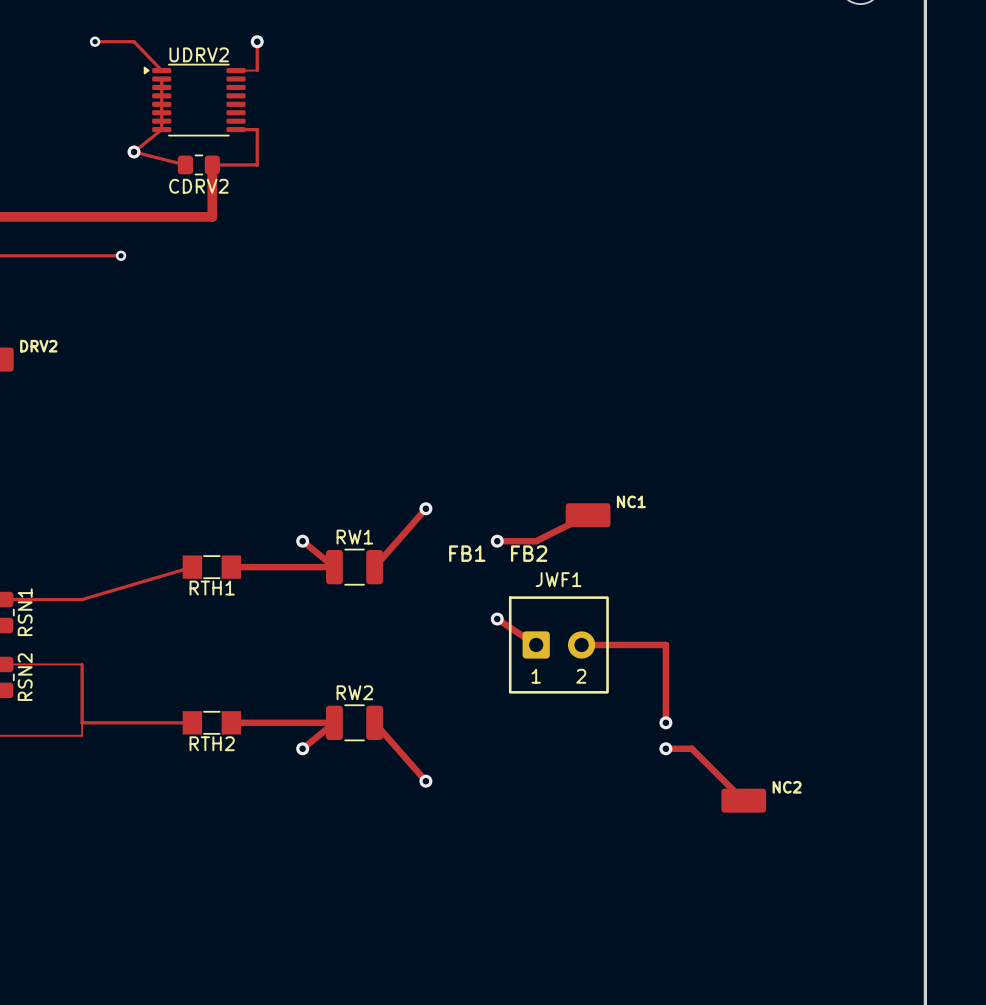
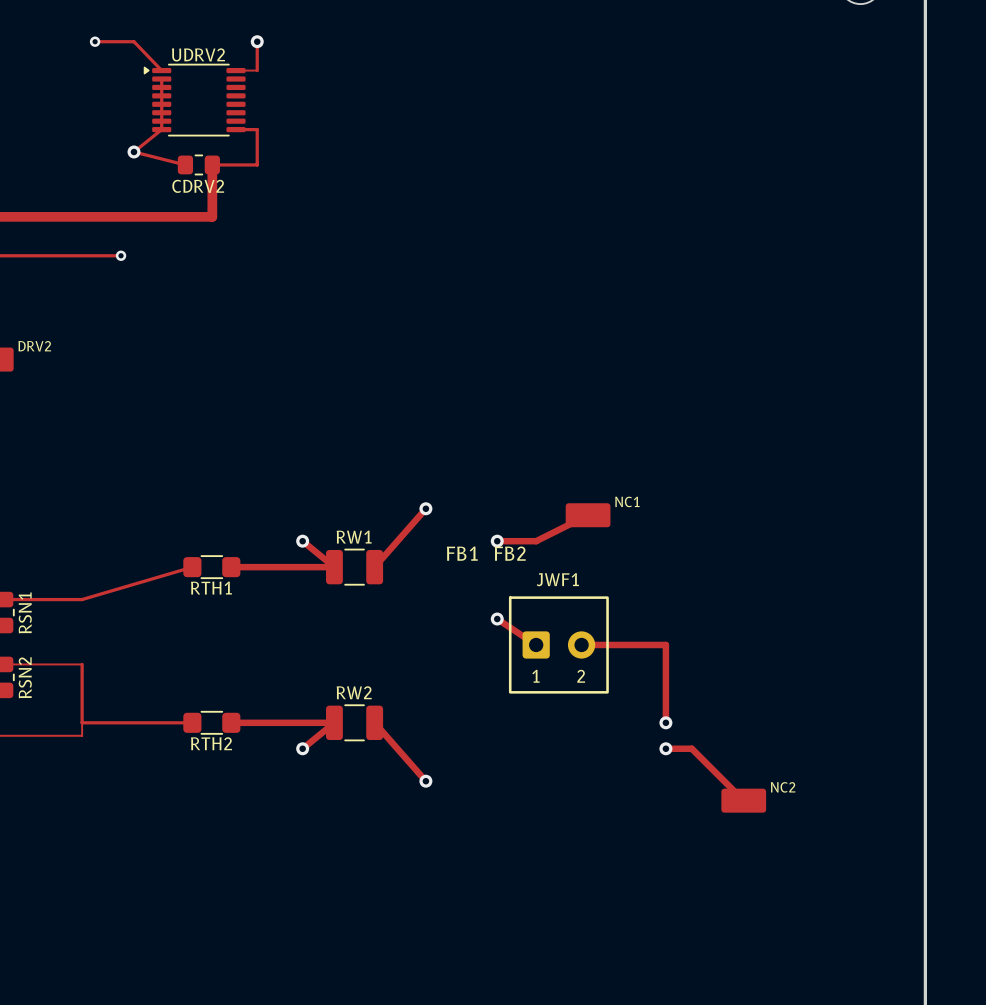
RTH1 footprint: [182, 555, 242, 579] -> [183, 555, 241, 579]
RTH2 footprint: [182, 711, 242, 735] -> [183, 711, 241, 735]

